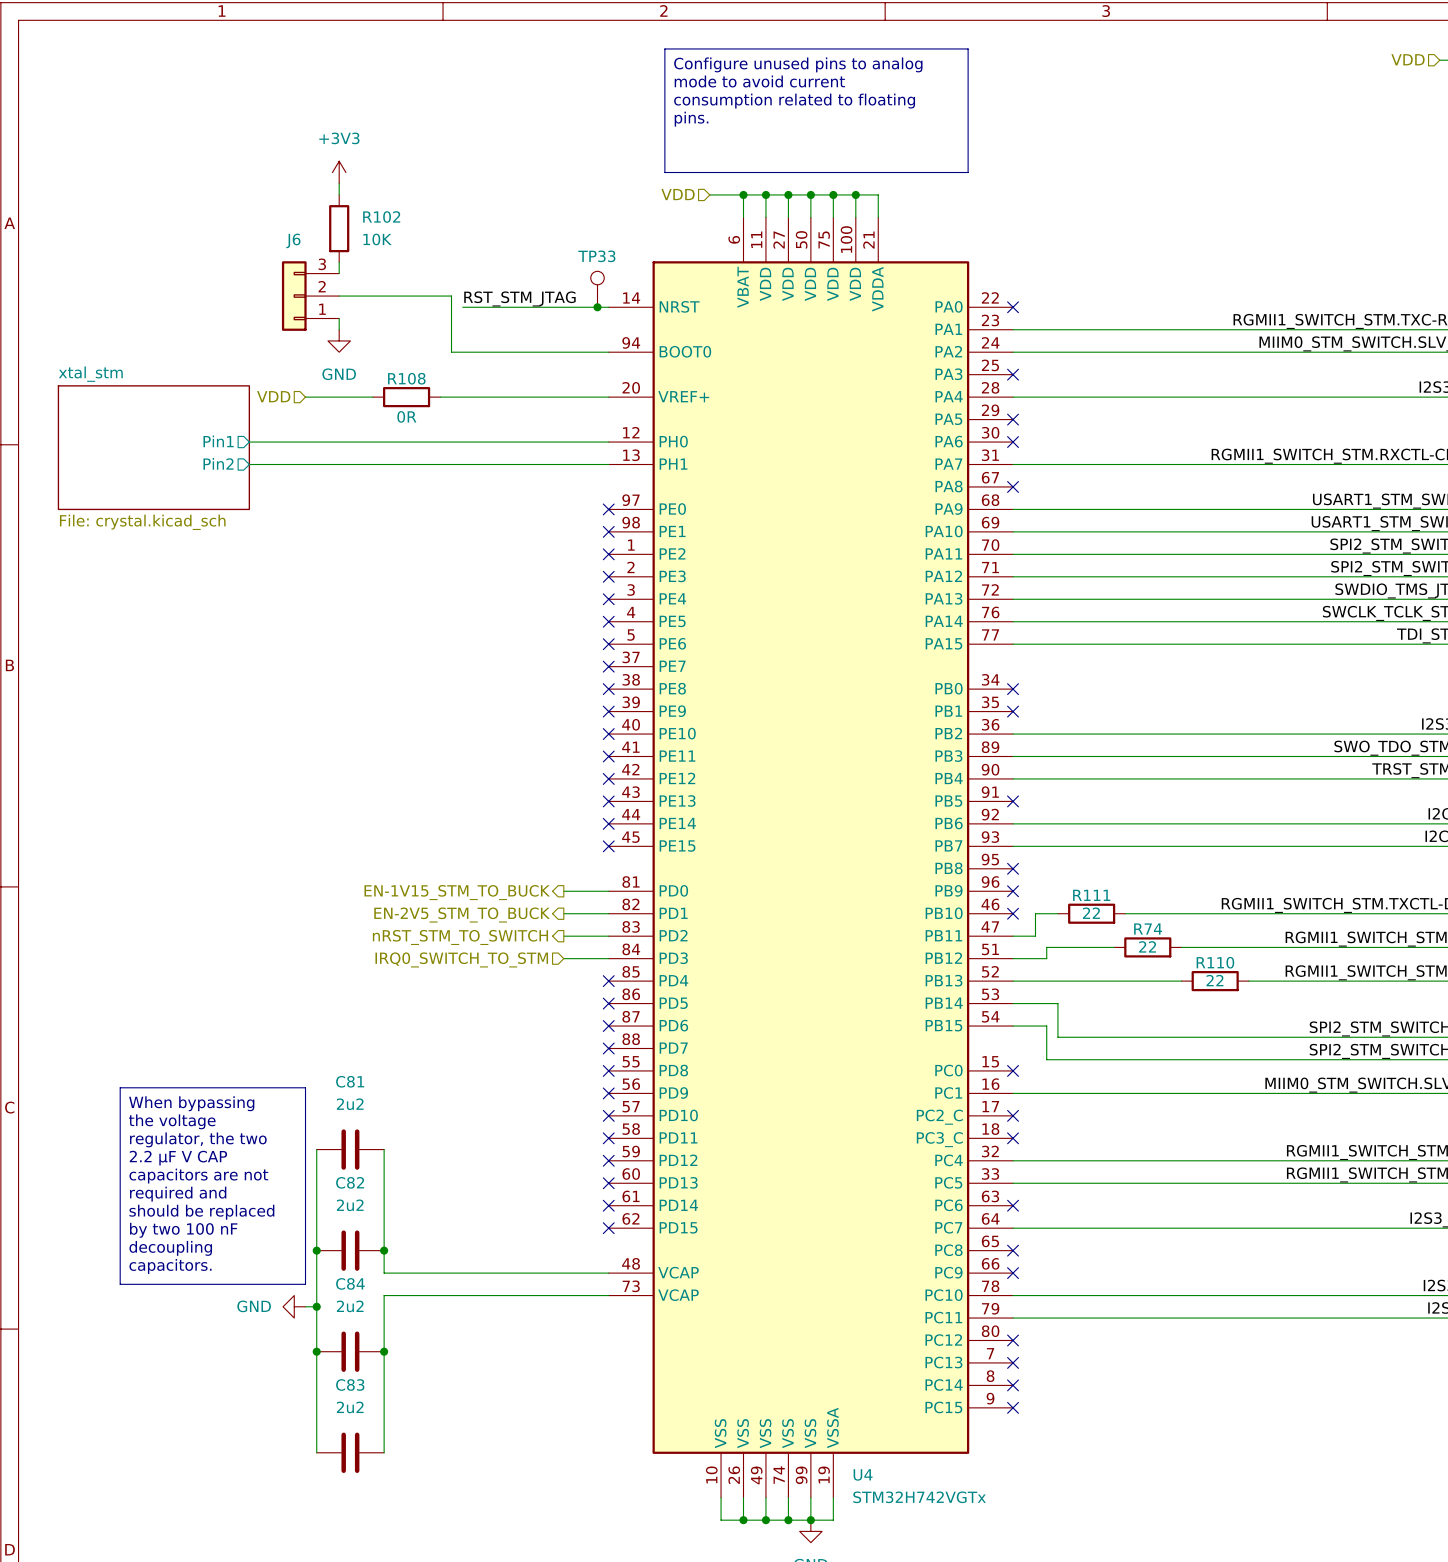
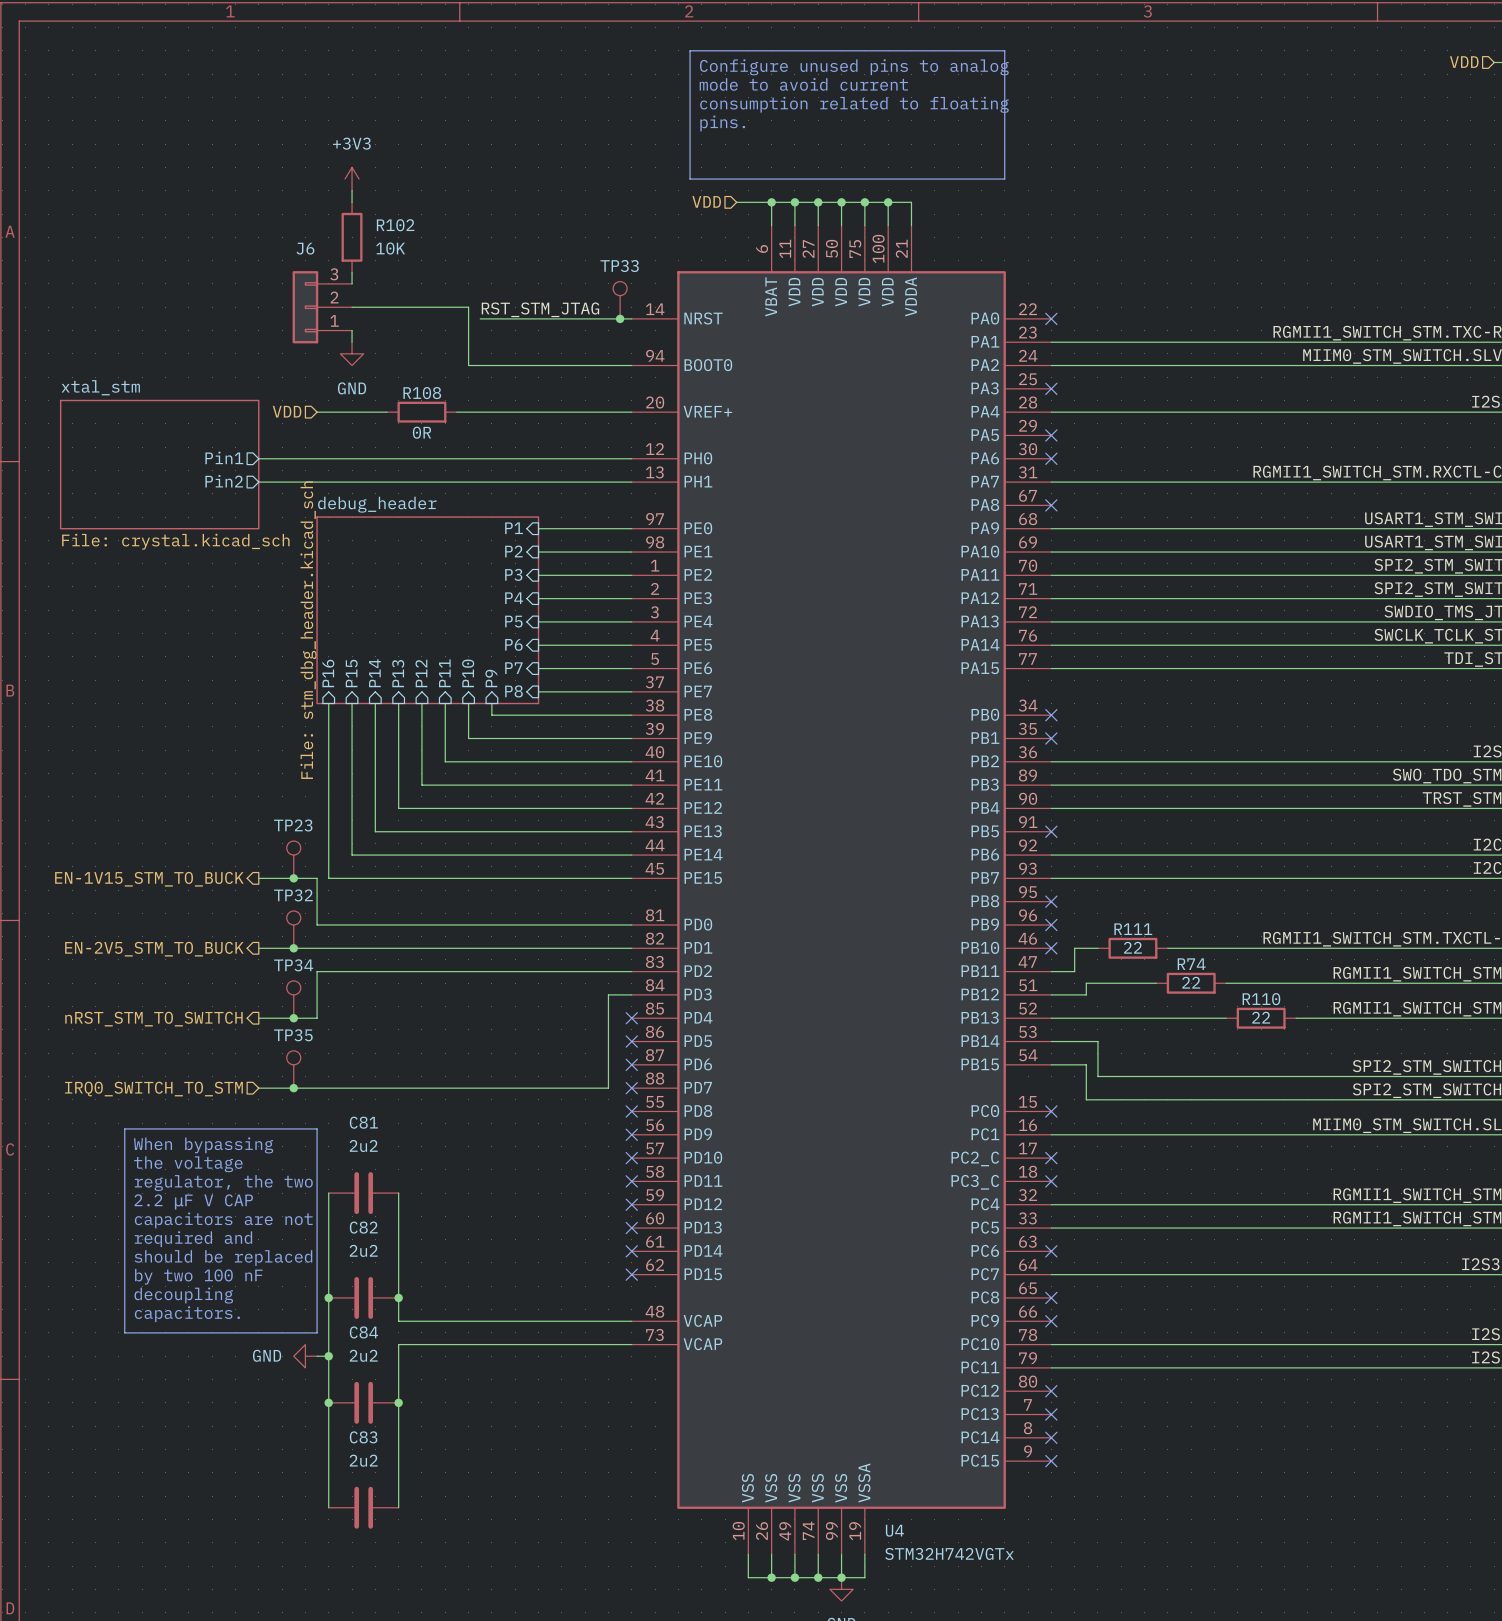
sheet pin: none -> P1 (514, 528)
wire: none -> (538, 528) (631, 528)
no-connect mark: (608, 509) -> none
sheet pin: none -> P2 (513, 551)
wire: none -> (538, 552) (631, 552)
no-connect mark: (608, 531) -> none
sheet pin: none -> P3 (513, 574)
wire: none -> (538, 575) (631, 575)
no-connect mark: (608, 554) -> none
sheet pin: none -> P4 (514, 598)
wire: none -> (538, 598) (631, 598)
no-connect mark: (608, 576) -> none
sheet debug_header: none -> File: stm_dbg_header.kicad_sch (427, 610)
sheet pin: none -> P5 (513, 621)
wire: none -> (538, 621) (631, 621)
no-connect mark: (608, 599) -> none
sheet pin: none -> P6 (513, 644)
wire: none -> (538, 645) (631, 645)
no-connect mark: (608, 621) -> none
sheet pin: none -> P7 (513, 668)
wire: none -> (538, 668) (631, 668)
no-connect mark: (608, 644) -> none
sheet pin: none -> P16 (328, 673)
sheet pin: none -> P14 (374, 673)
sheet pin: none -> P10 (468, 673)
sheet pin: none -> P15 (351, 673)
sheet pin: none -> P13 (398, 673)
sheet pin: none -> P12 (421, 673)
sheet pin: none -> P11 (444, 673)
sheet pin: none -> P9 (491, 678)
sheet pin: none -> P8 (513, 691)
wire: none -> (538, 691) (631, 691)
no-connect mark: (608, 666) -> none
wire: none -> (328, 703) (328, 878) (631, 878)
wire: none -> (352, 703) (352, 855) (631, 855)
wire: none -> (375, 703) (375, 831) (631, 831)
wire: none -> (398, 703) (398, 808) (631, 808)
wire: none -> (421, 703) (421, 785) (631, 785)
wire: none -> (445, 703) (445, 761) (631, 761)
wire: none -> (468, 703) (468, 738) (631, 738)
wire: none -> (491, 703) (491, 715) (631, 715)
no-connect mark: (608, 689) -> none
no-connect mark: (608, 711) -> none
no-connect mark: (608, 734) -> none
no-connect mark: (608, 756) -> none
no-connect mark: (608, 778) -> none
no-connect mark: (608, 801) -> none
no-connect mark: (608, 823) -> none
TP23: none -> (293, 859)
wire: none -> (258, 878) (317, 878) (317, 924) (585, 924)
junction: none -> (293, 878)
no-connect mark: (608, 846) -> none
hierarchical label: none -> EN-1V15_STM_TO_BUCK (149, 879)
hierarchical label: EN-1V15_STM_TO_BUCK (457, 892) -> none
TP32: none -> (293, 929)
wire: none -> (258, 948) (585, 948)
junction: none -> (293, 948)
hierarchical label: none -> EN-2V5_STM_TO_BUCK (154, 949)
hierarchical label: EN-2V5_STM_TO_BUCK (462, 915) -> none
wire: none -> (585, 971) (317, 971) (317, 1018) (258, 1018)
hierarchical label: nRST_STM_TO_SWITCH (460, 937) -> none
wire: (563, 958) (586, 958) -> (258, 1088) (608, 1088) (608, 994)
hierarchical label: IRQ0_SWITCH_TO_STM (461, 959) -> none
TP34: none -> (293, 999)
junction: none -> (293, 1018)
hierarchical label: none -> nRST_STM_TO_SWITCH (153, 1019)
TP35: none -> (293, 1069)
junction: none -> (293, 1088)
hierarchical label: none -> IRQ0_SWITCH_TO_STM (153, 1089)

